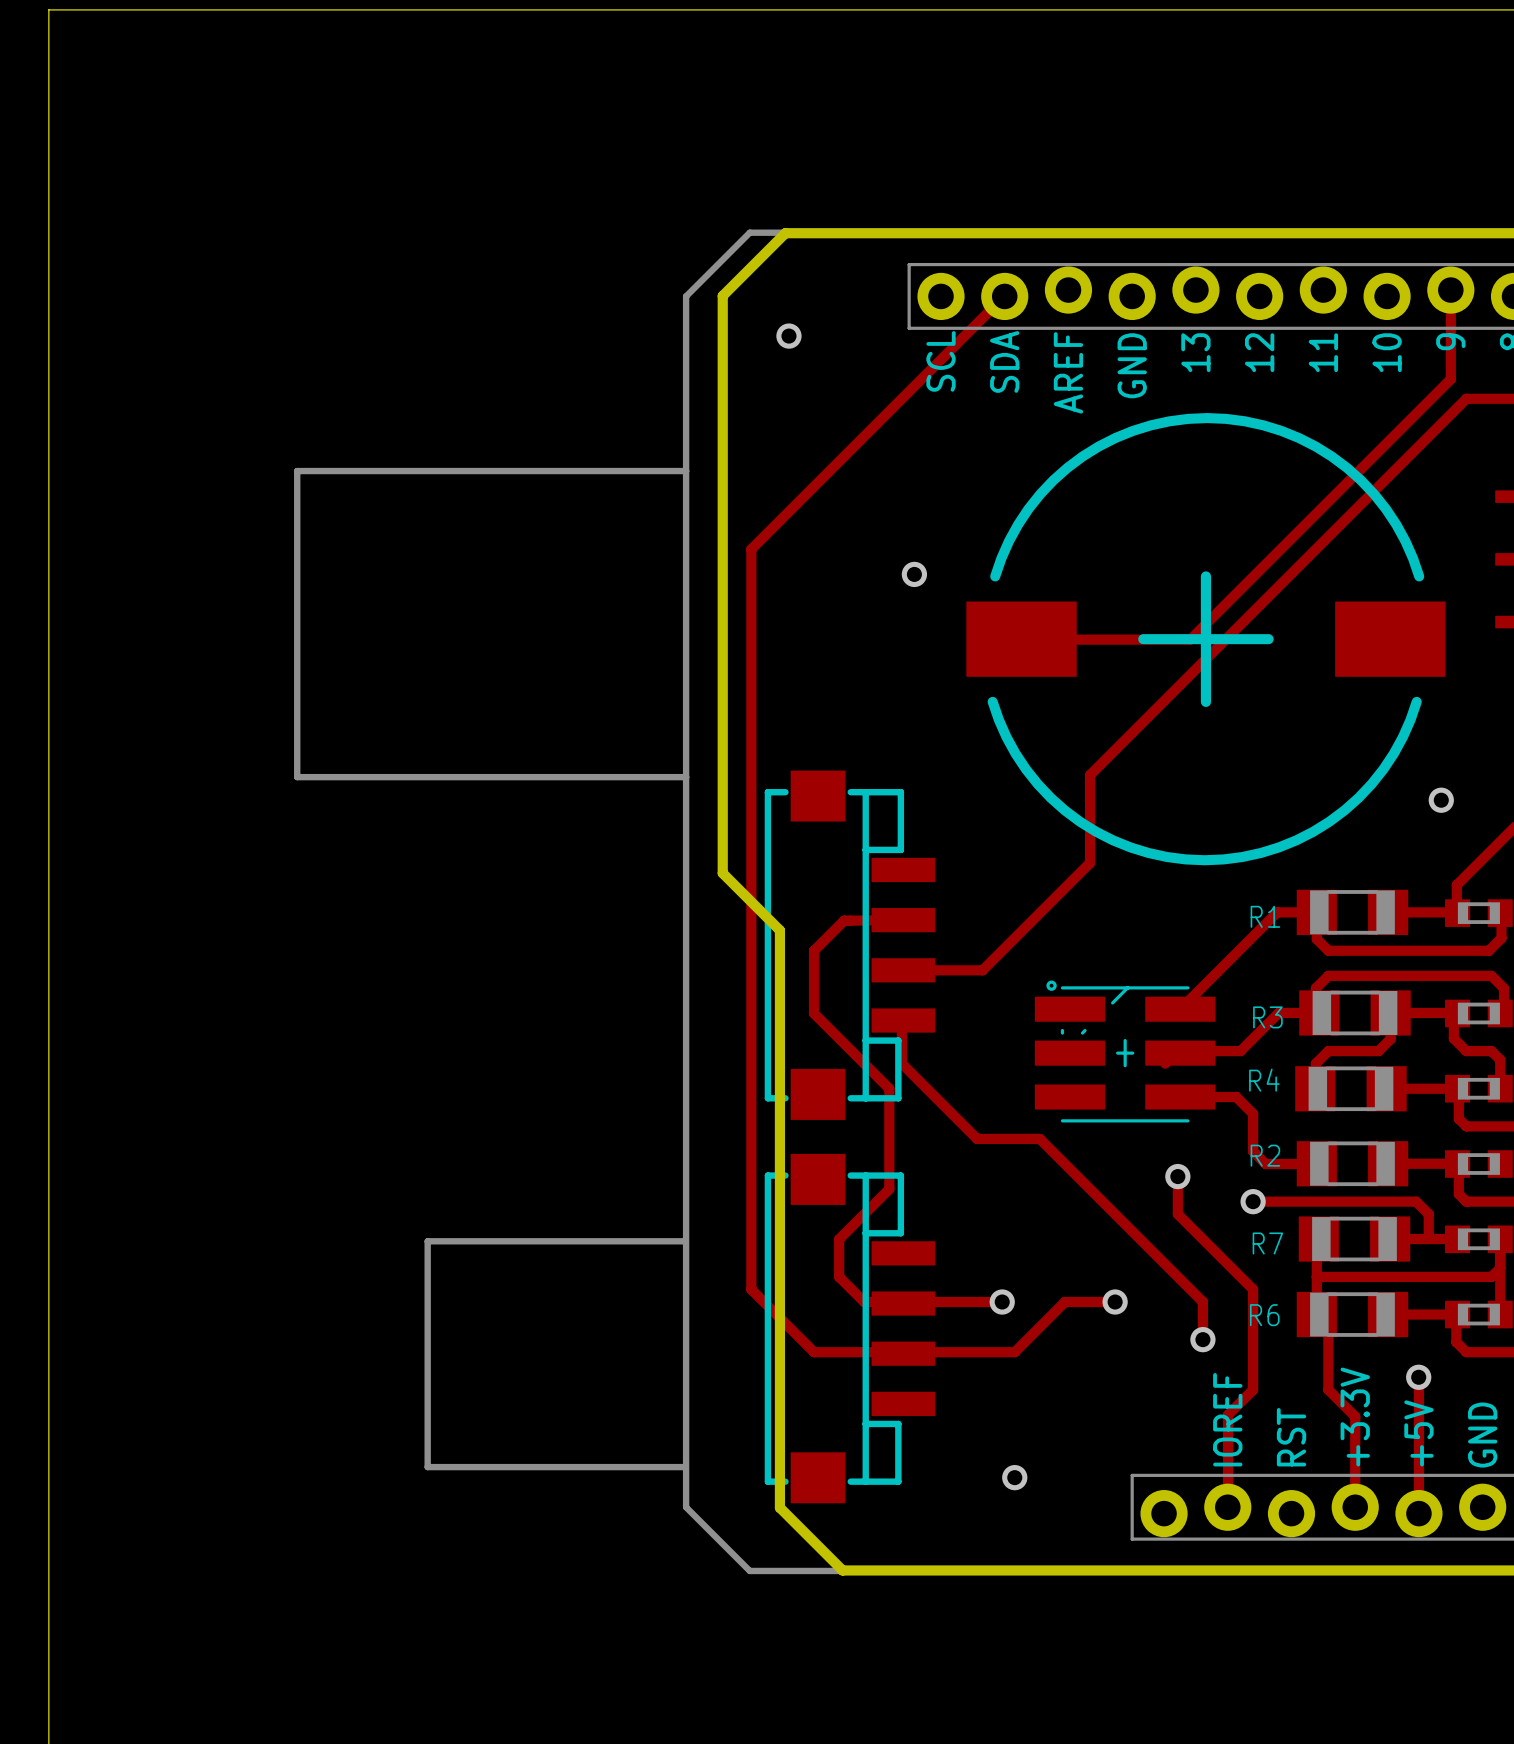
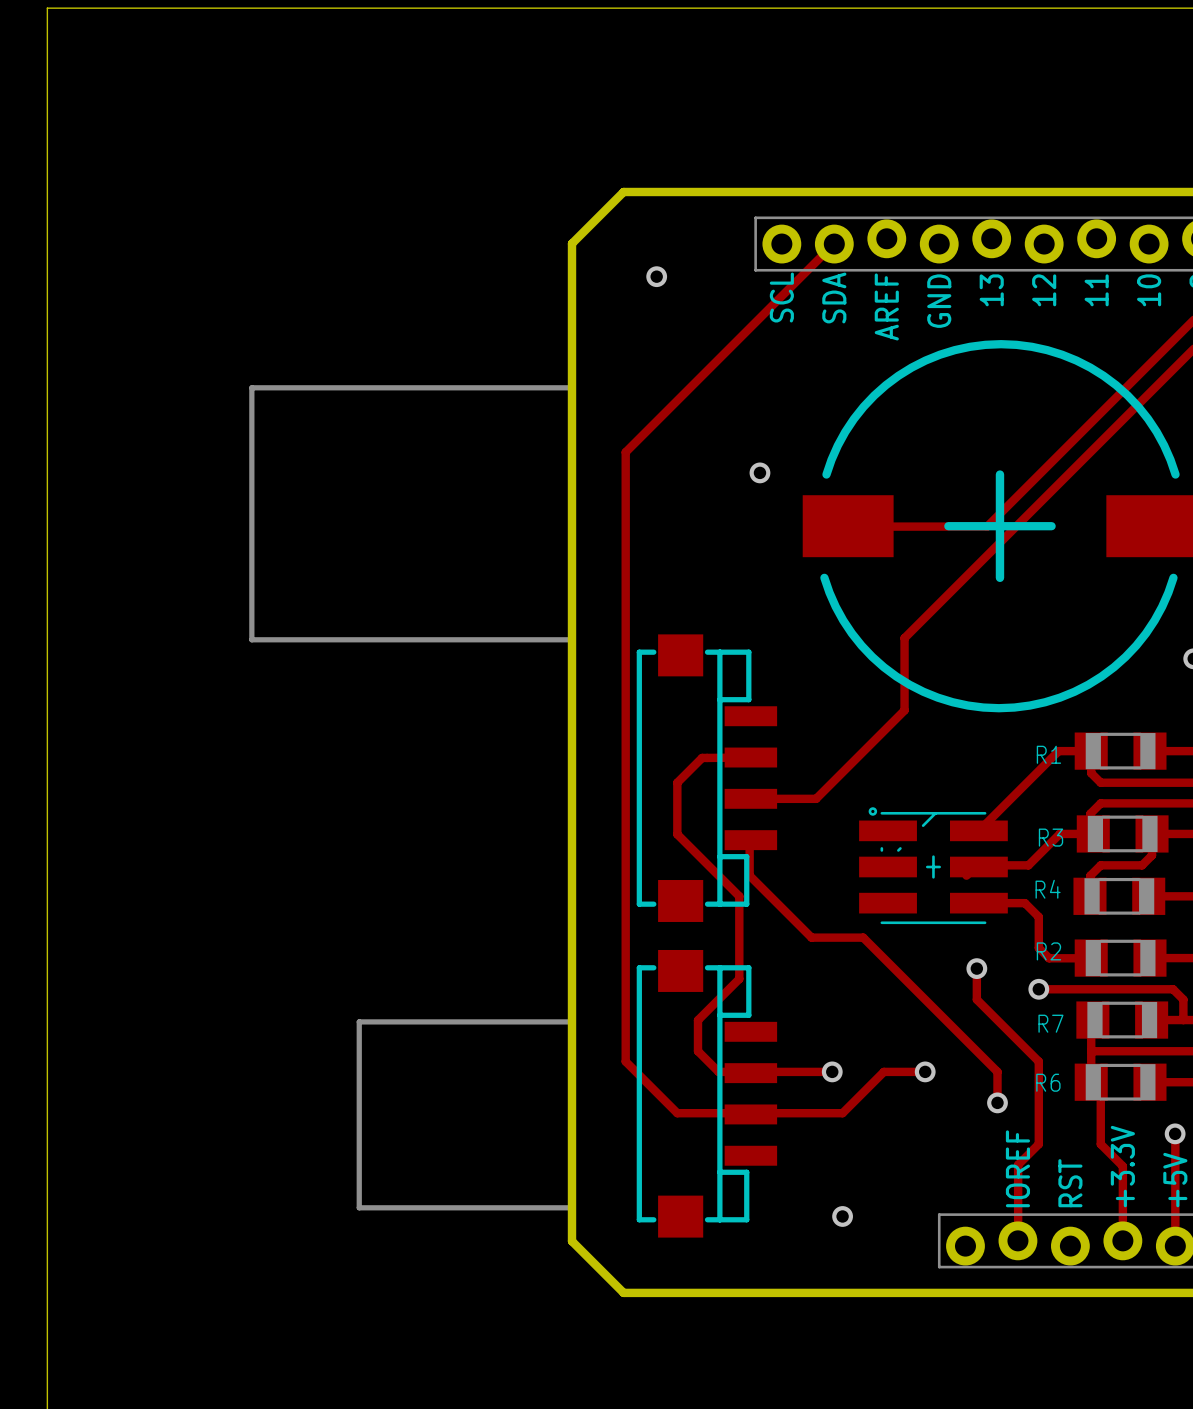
board edge: (785, 233) (722, 295) (722, 873) (779, 930) (779, 1507) (842, 1570) -> (653, 191) (623, 191) (572, 243) (572, 1241) (623, 1292) (700, 1292)

